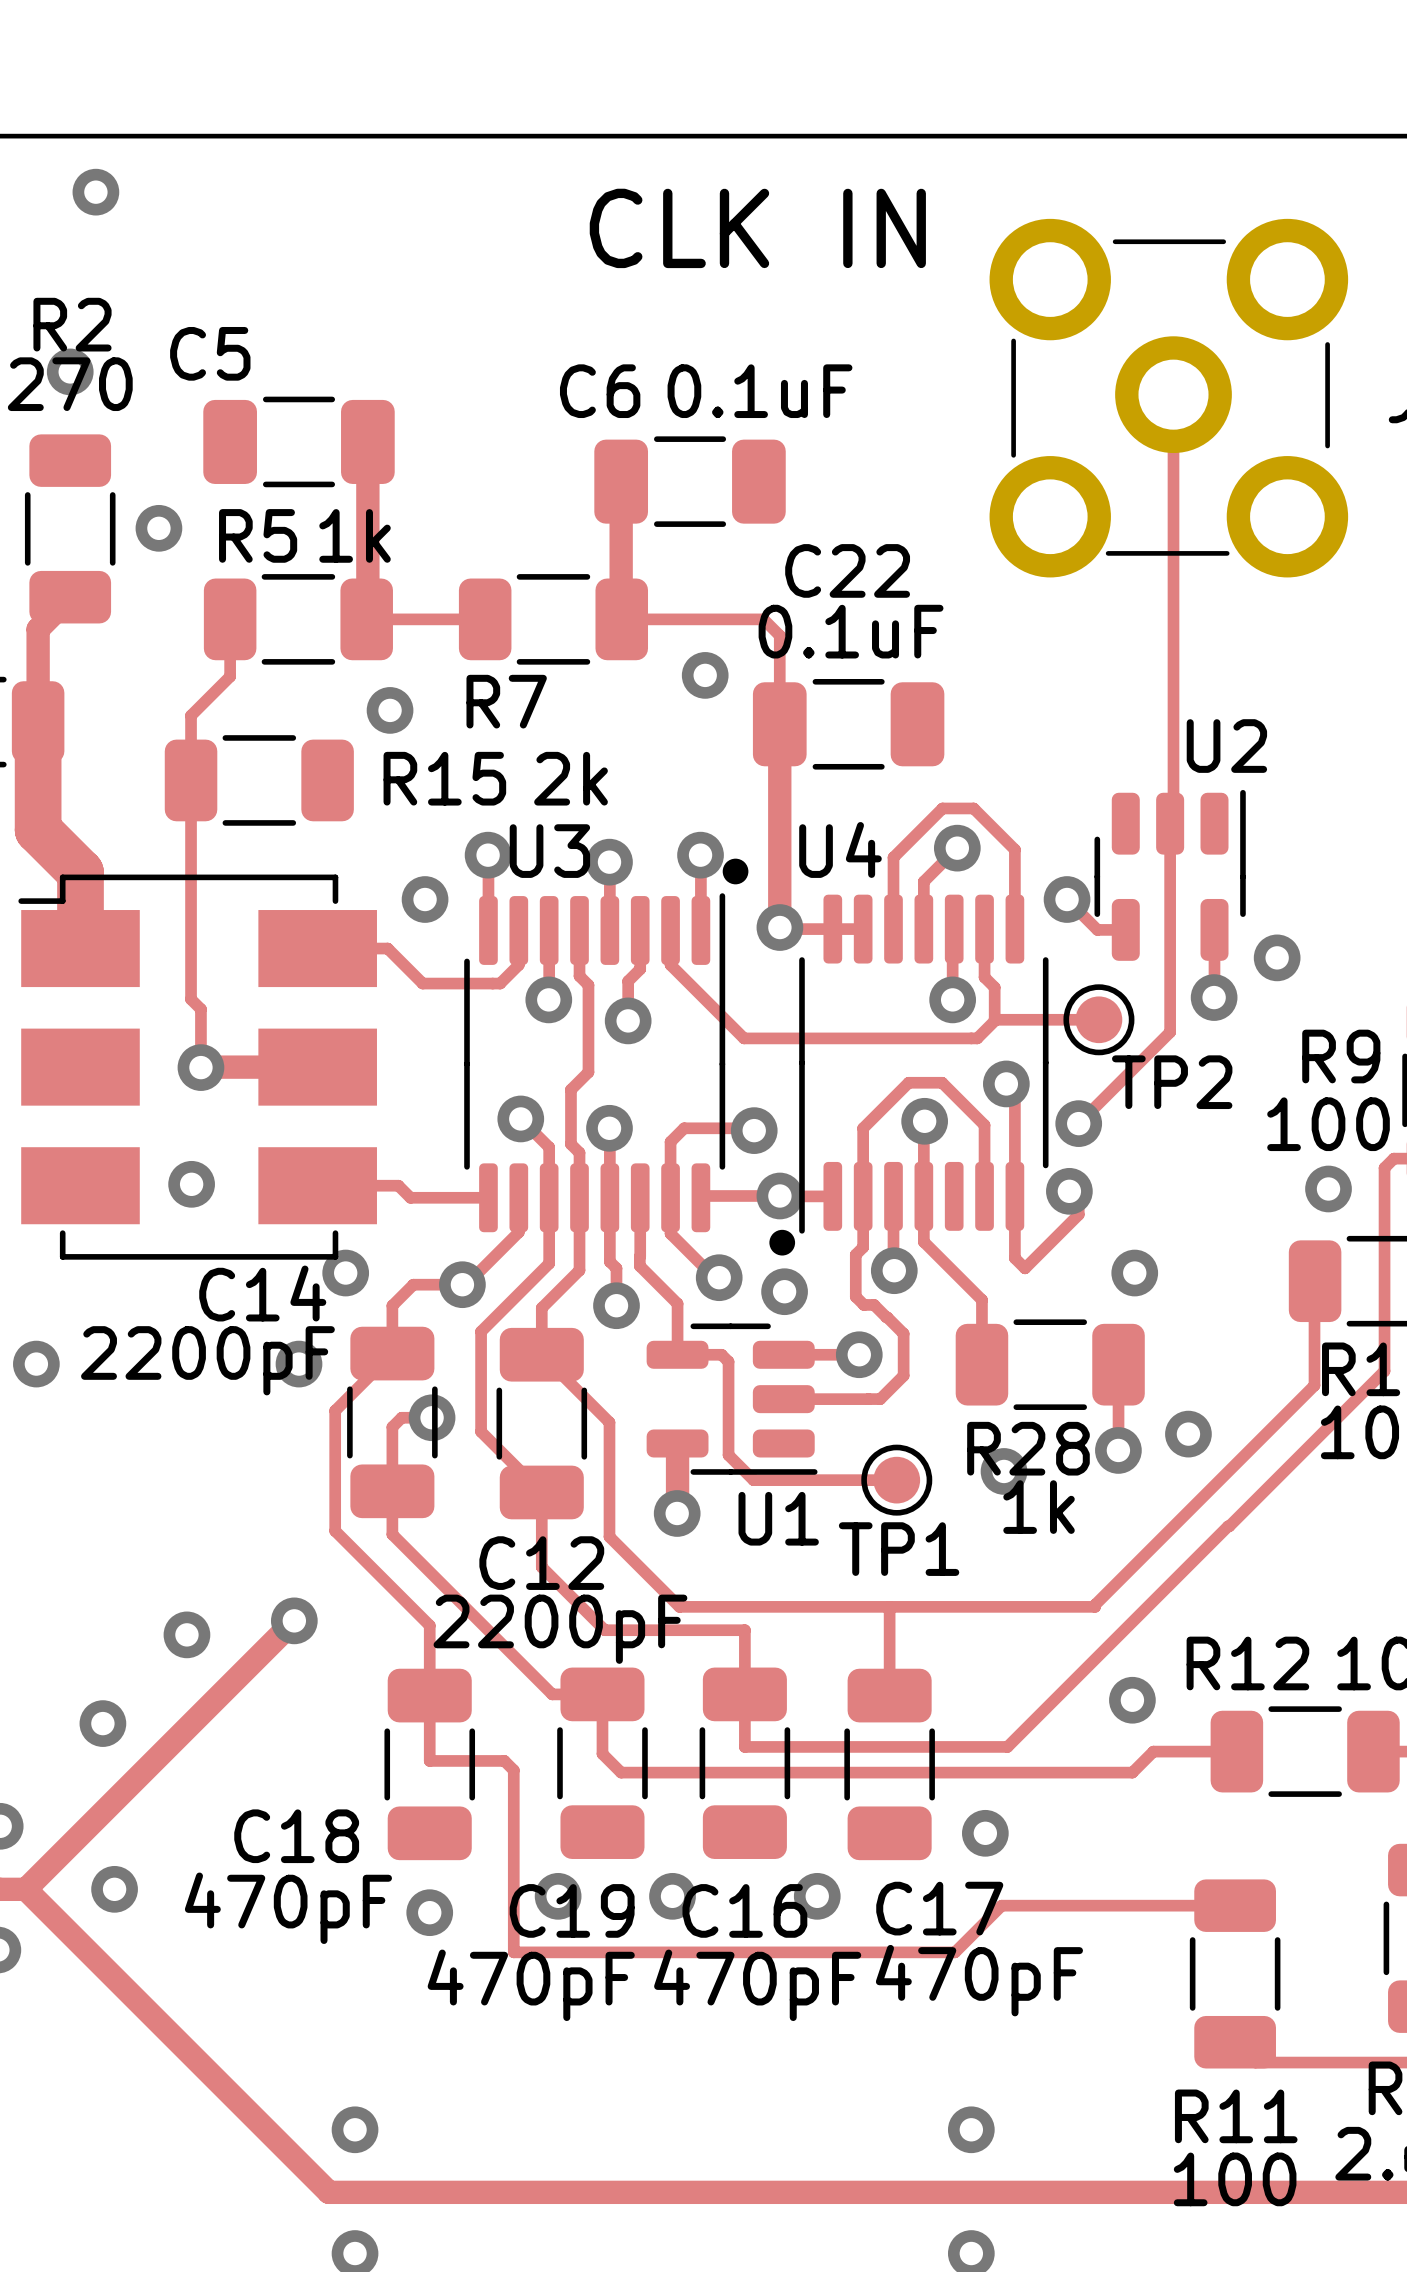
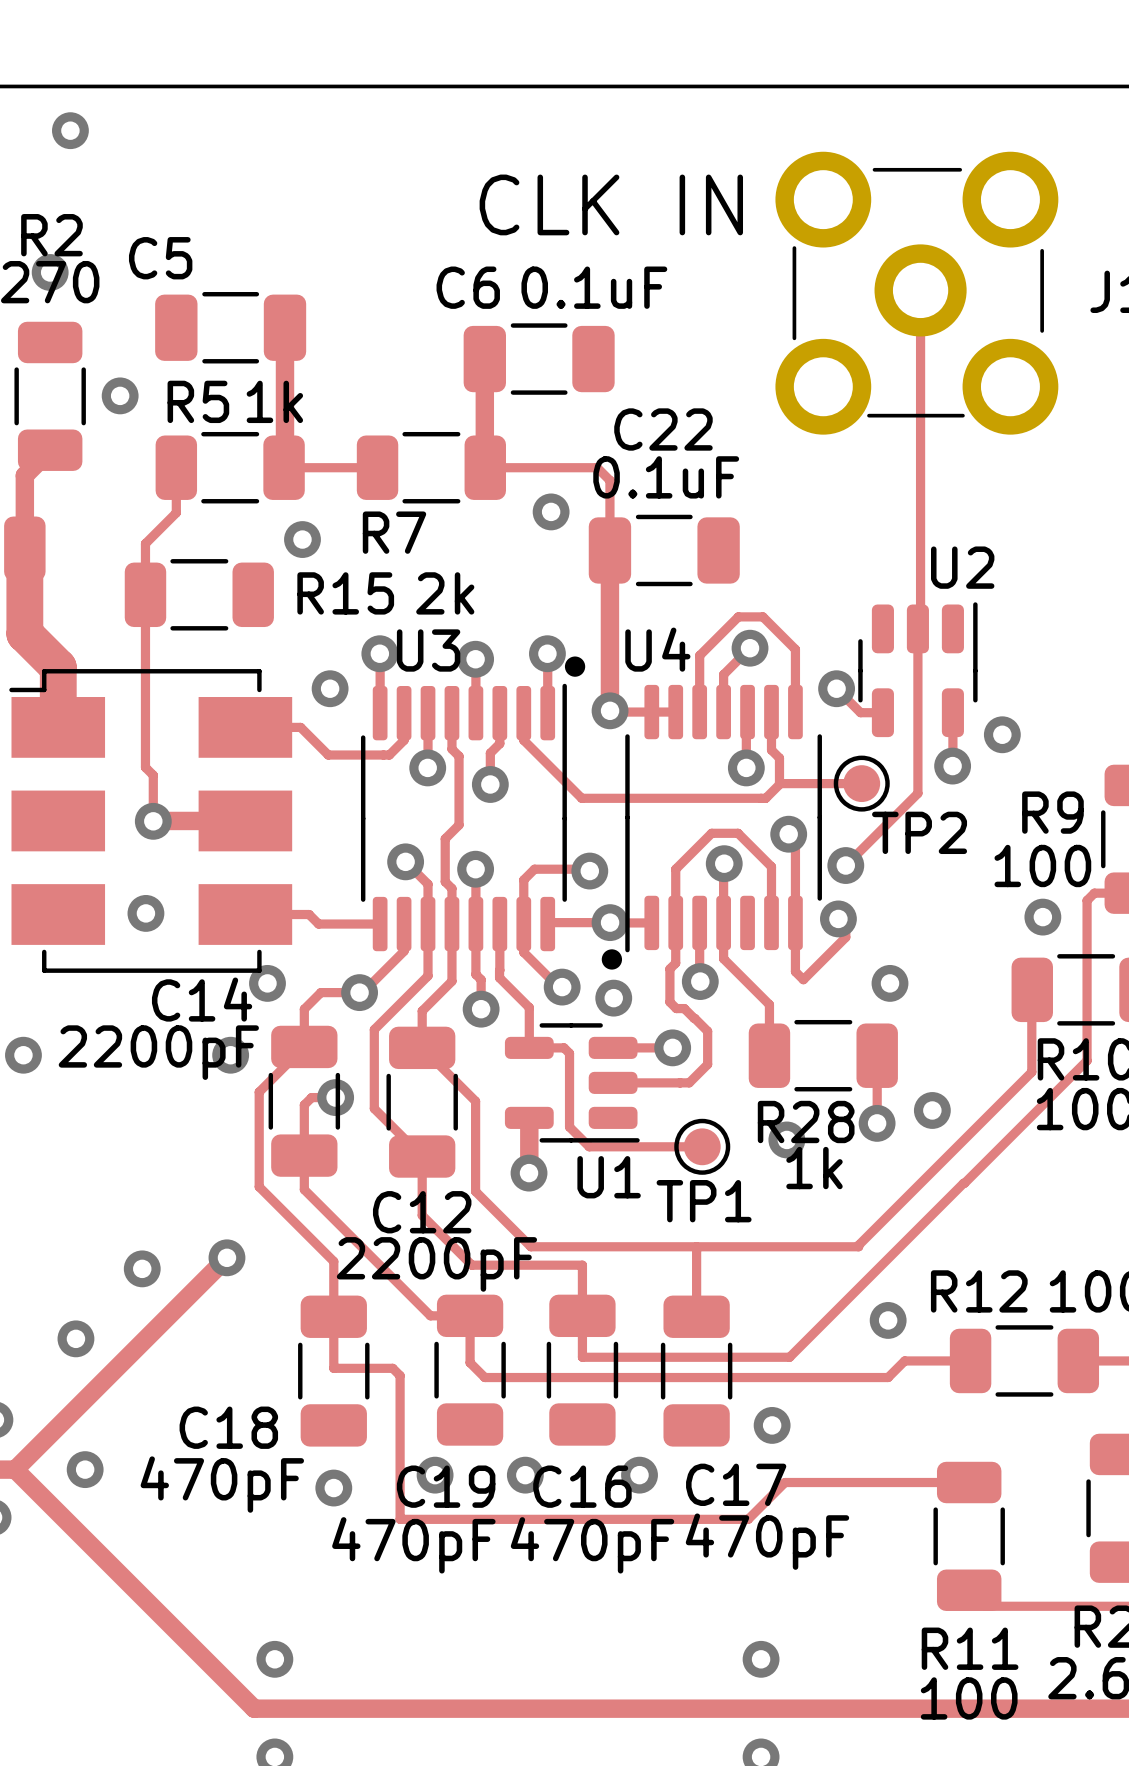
text position: CLK IN (757, 228) -> CLK IN (611, 204)

